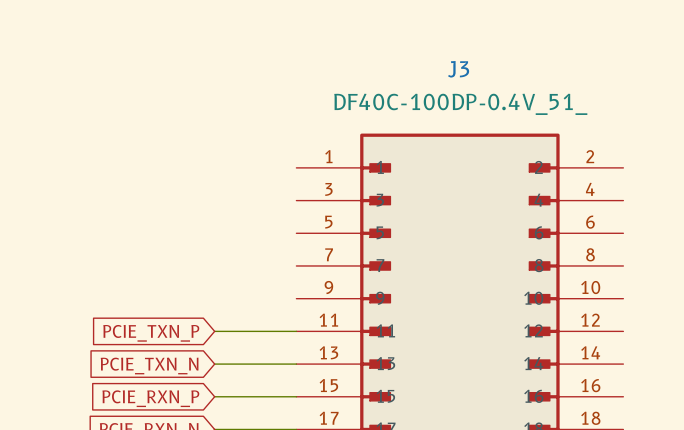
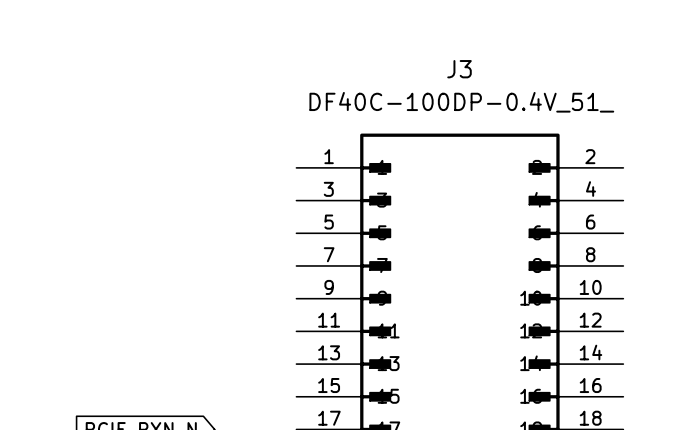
wire: (214, 331) (296, 331) -> none
global label: PCIE_TXN_P (151, 333) -> none
wire: (214, 364) (296, 364) -> none
global label: PCIE_TXN_N (149, 366) -> none
wire: (214, 396) (296, 396) -> none
global label: PCIE_RXN_P (150, 398) -> none
wire: (214, 429) (296, 429) -> none

